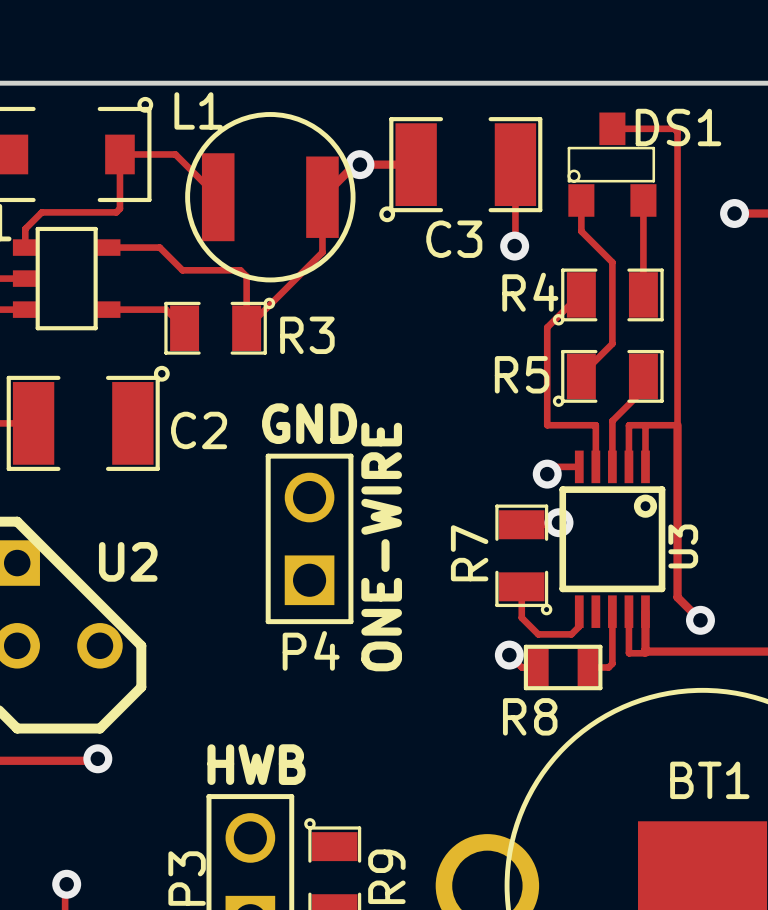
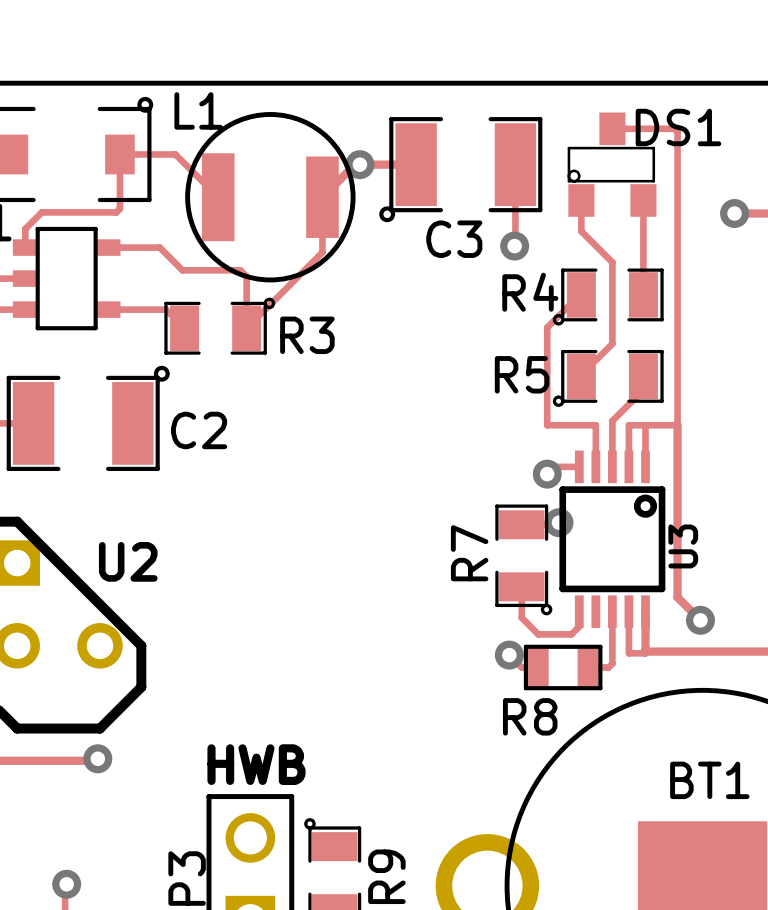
text: GND (309, 423) -> none
P4: (309, 538) -> none
text: ONE-WIRE (381, 547) -> none

